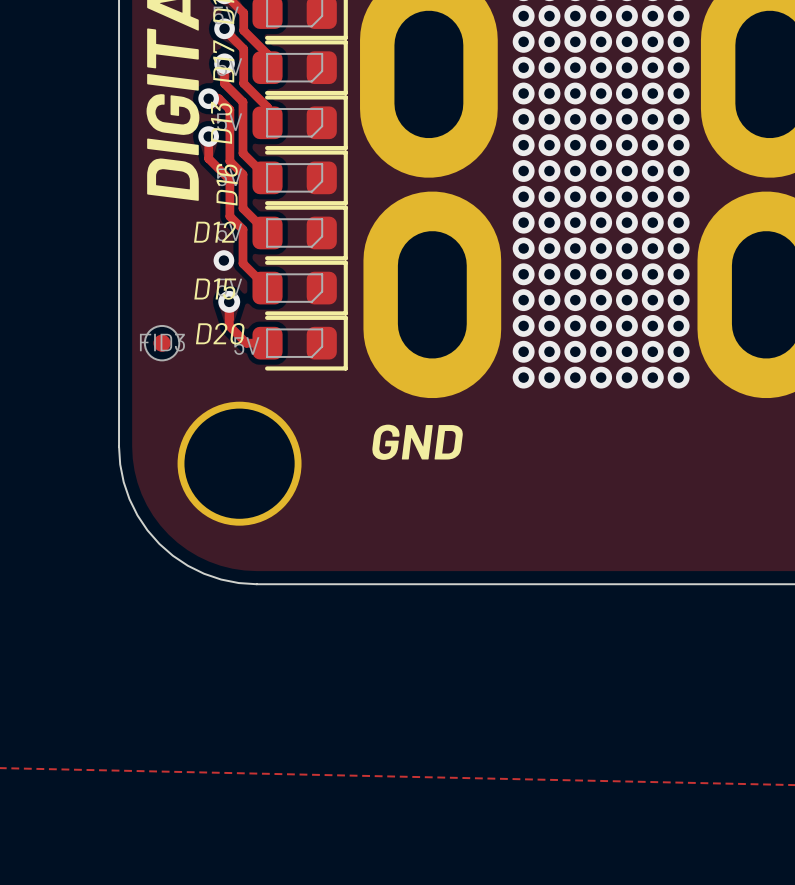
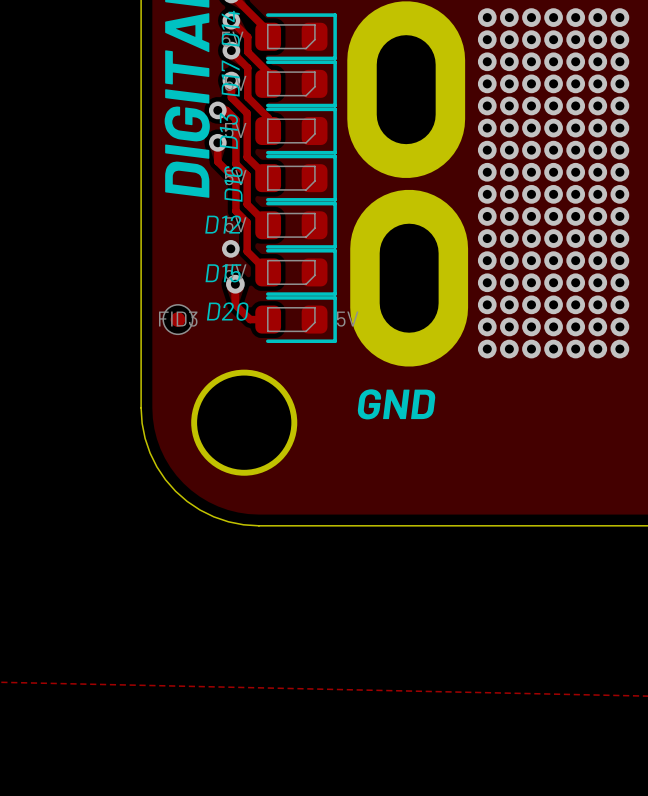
D20 value position: 5V (246, 346) -> 5V (347, 319)

